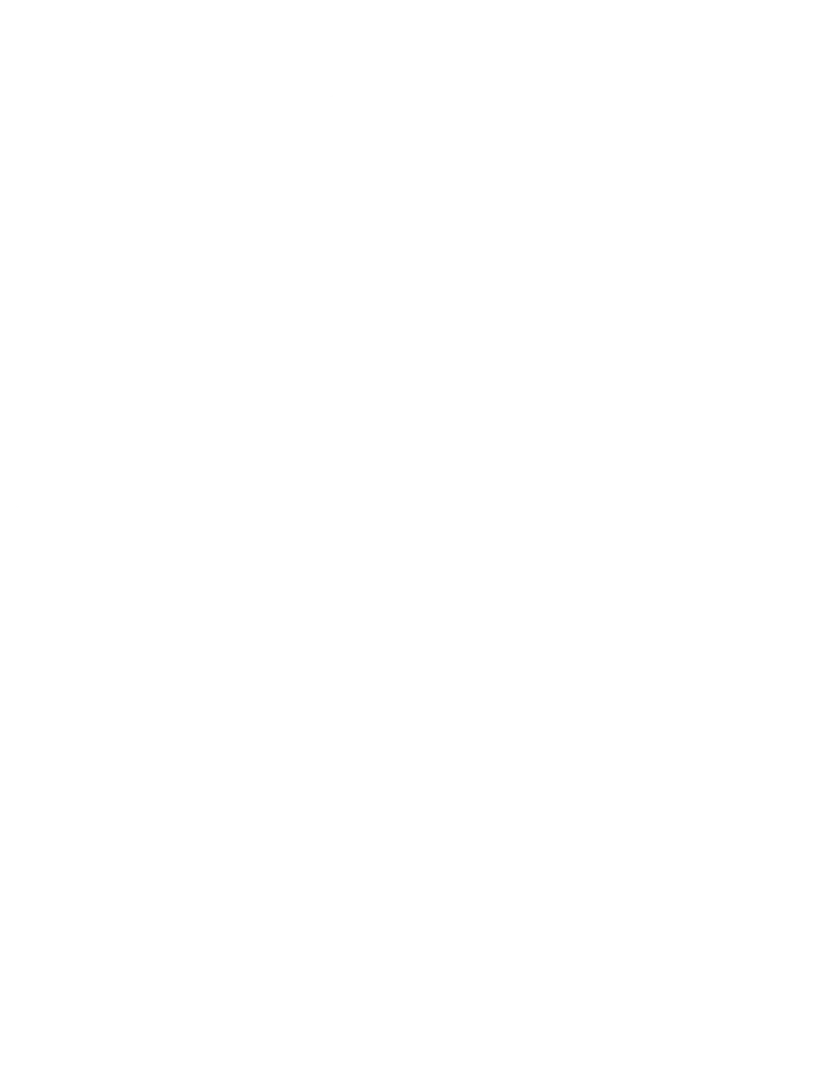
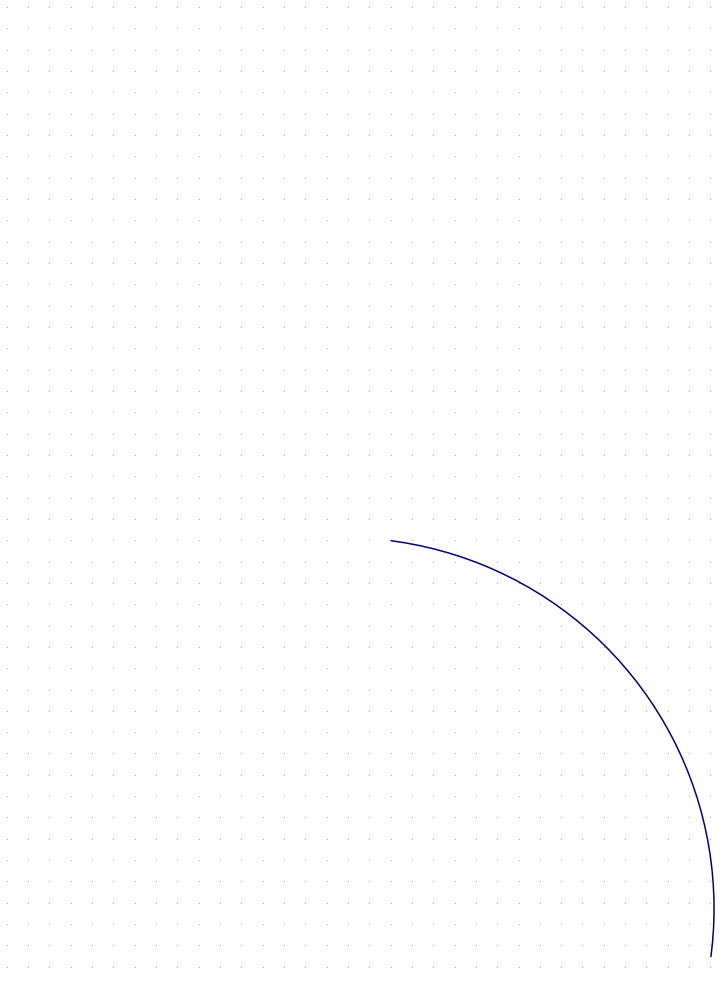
line: none -> (391, 540) (419, 545) (461, 557) (489, 567) (528, 587) (552, 602) (587, 629) (618, 660) (637, 682) (661, 718) (675, 744) (687, 770) (701, 812) (707, 840) (713, 883) (714, 913) (710, 956)

